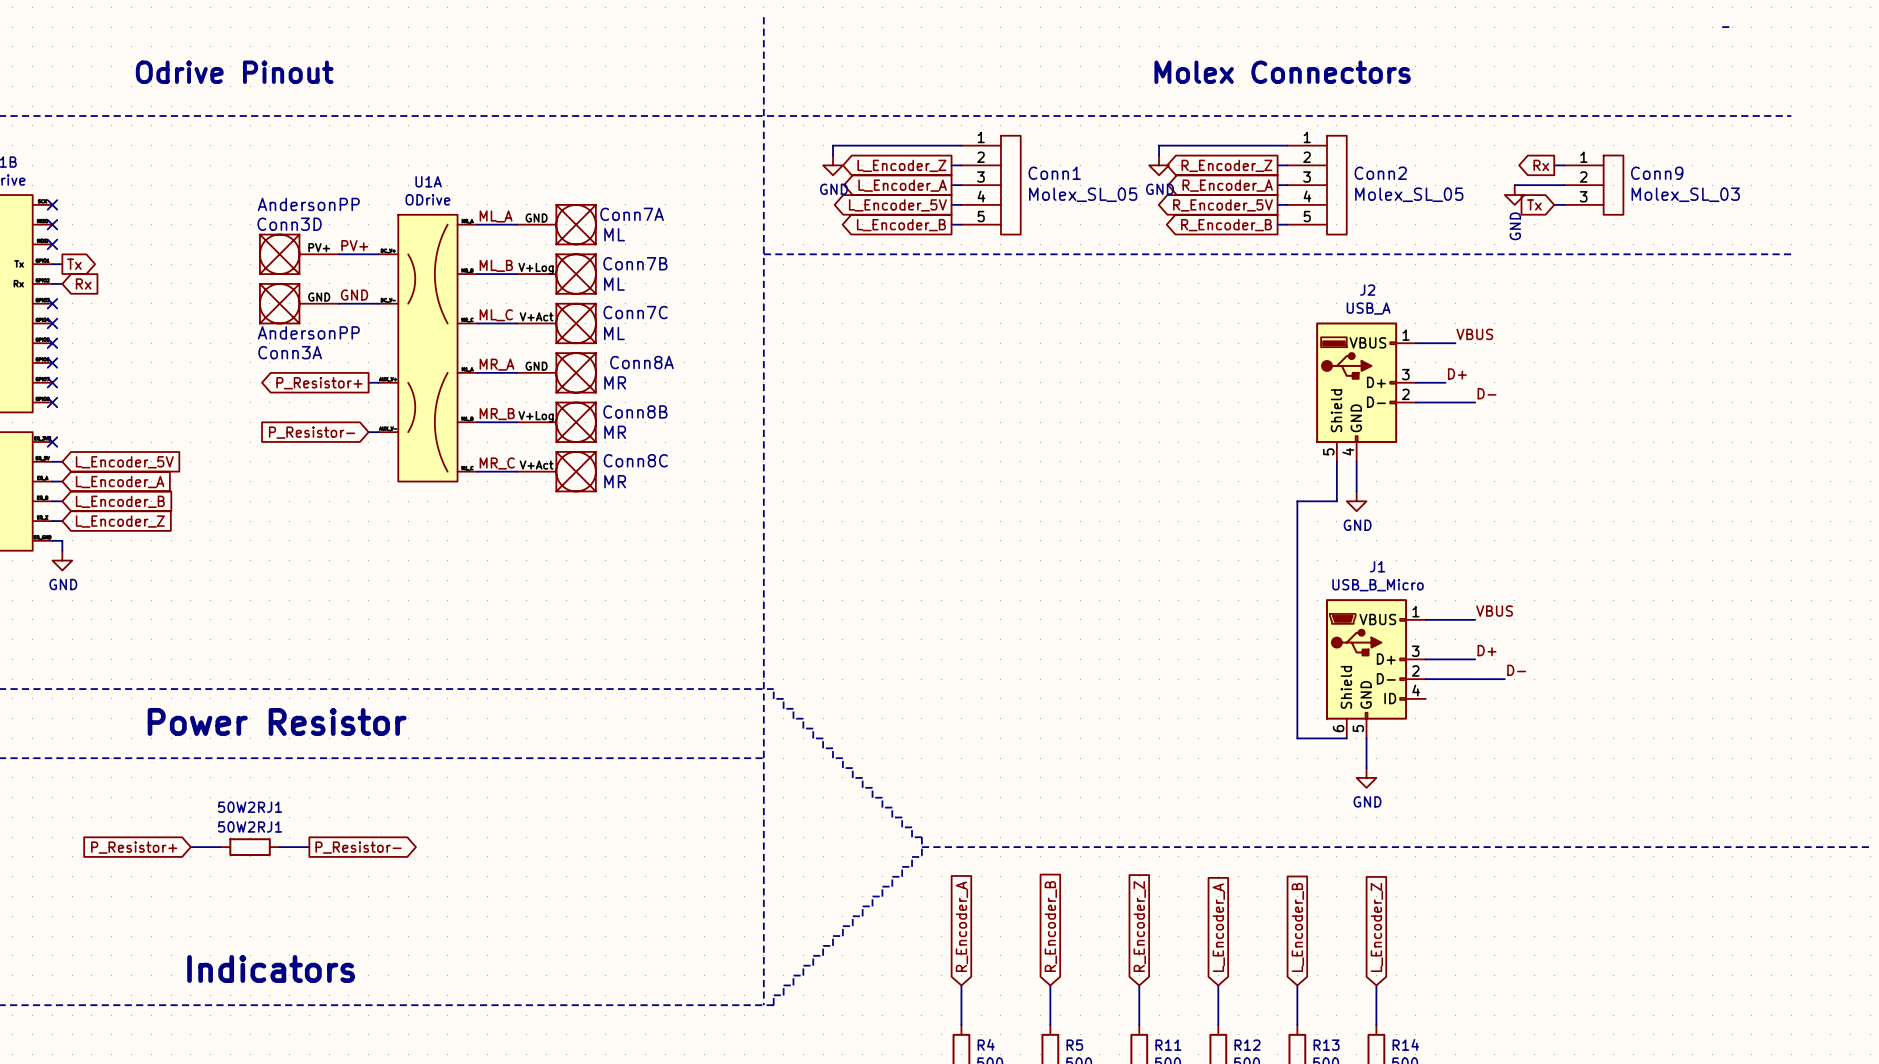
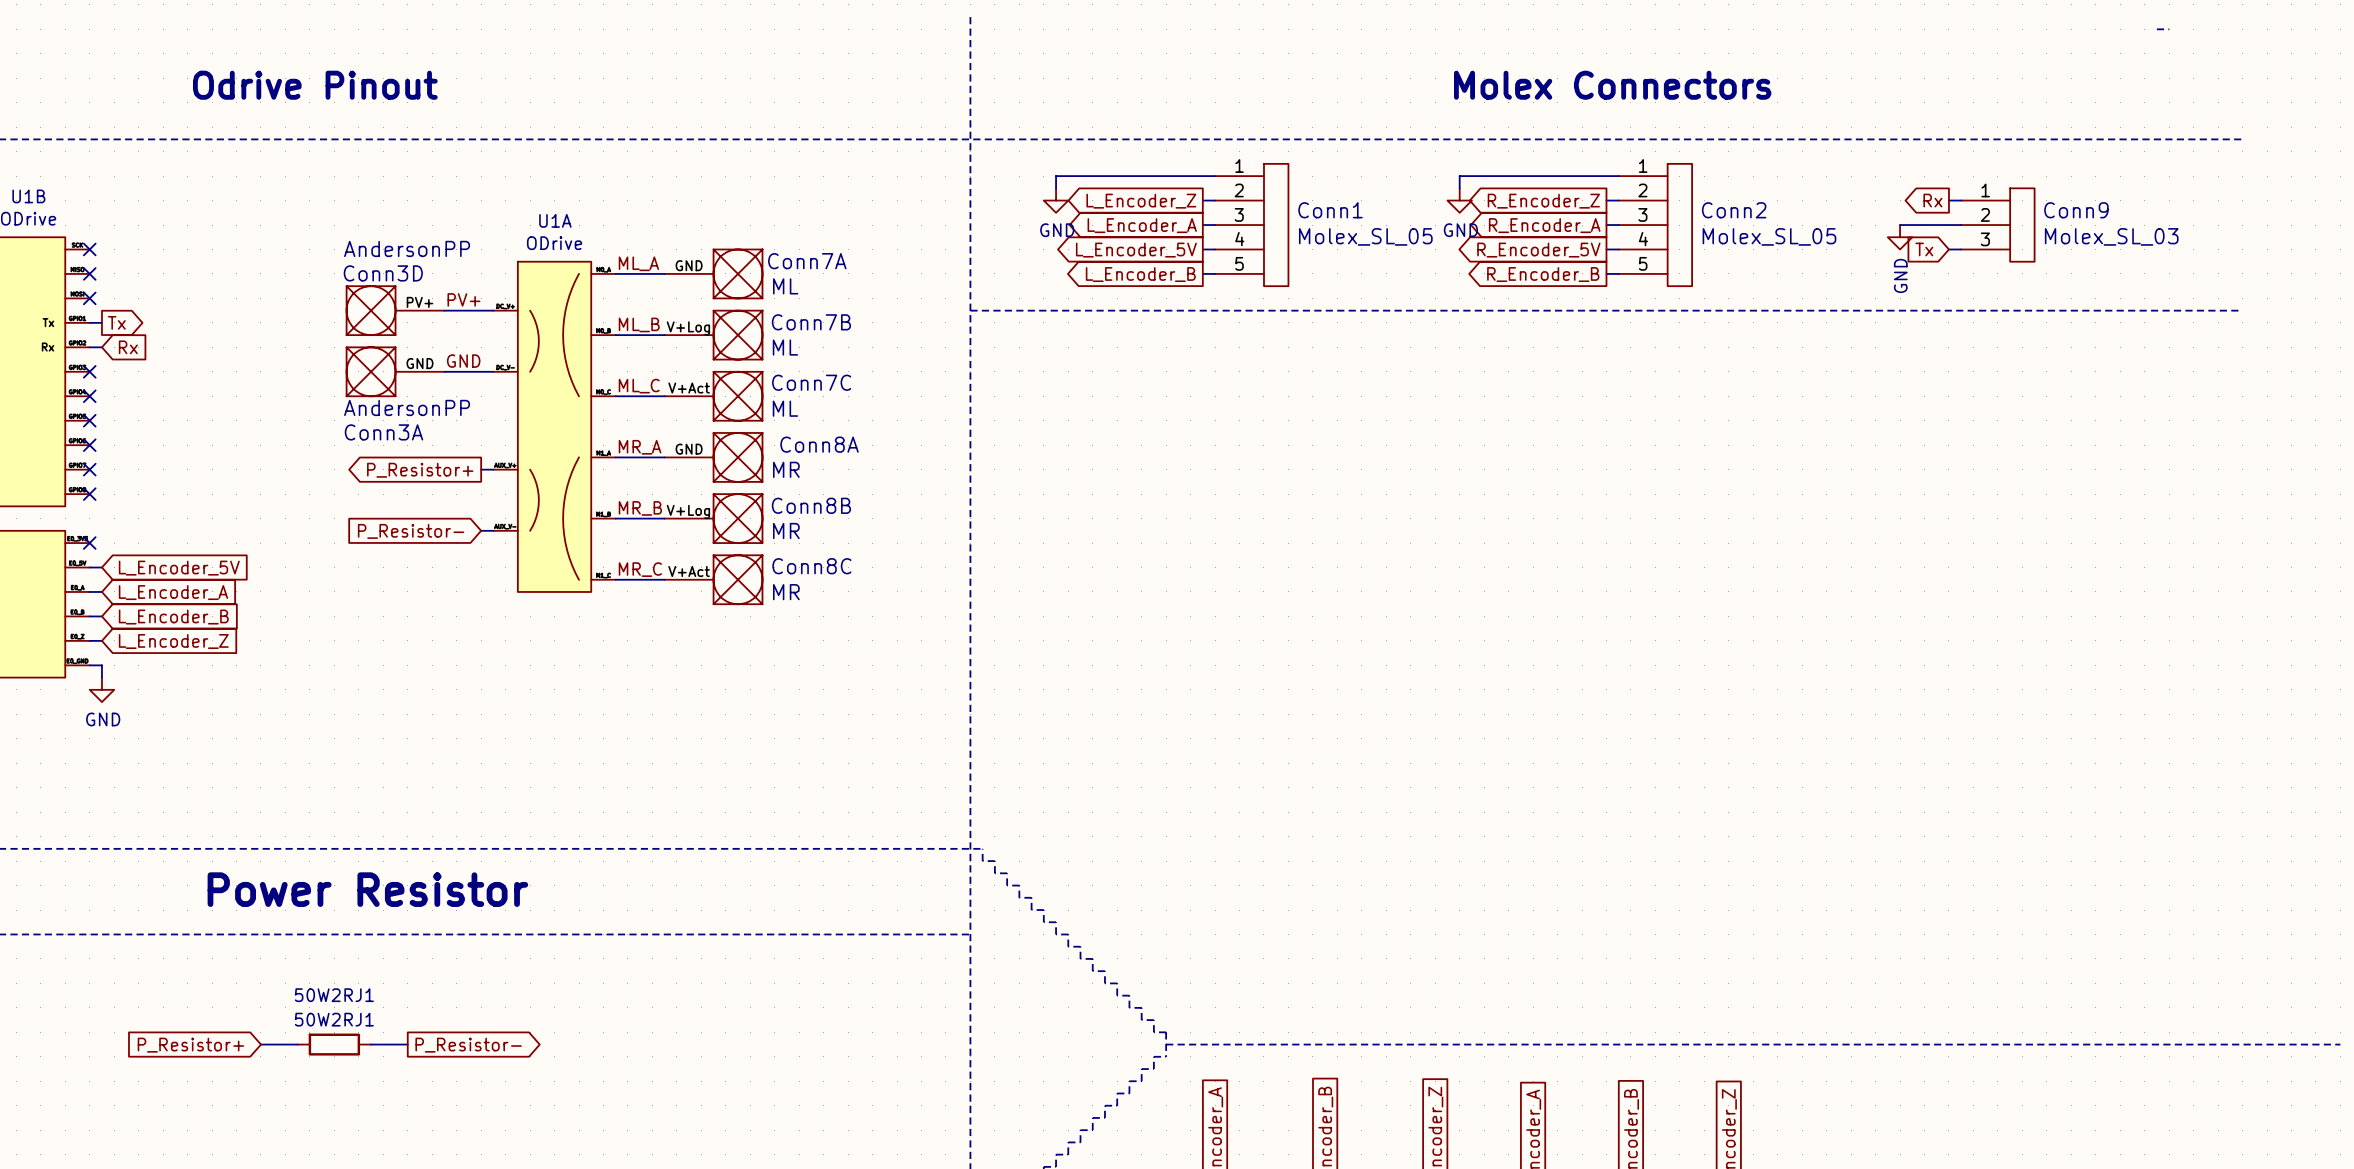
label: VBUS (1474, 334) -> none
wire: (1415, 343) (1455, 343) -> none
label: D+ (1457, 373) -> none
wire: (1415, 382) (1445, 382) -> none
J2: USB_A (1366, 392) -> none
label: D- (1487, 393) -> none
wire: (1415, 402) (1475, 402) -> none
wire: (1336, 461) (1336, 501) (1297, 501) (1297, 738) (1346, 738) -> none
wire: (1356, 461) (1356, 491) -> none
power symbol: GND (1356, 501) -> none
label: VBUS (1494, 611) -> none
wire: (1425, 619) (1475, 619) -> none
label: D+ (1487, 650) -> none
wire: (1425, 659) (1475, 659) -> none
J1: USB_B_Micro (1375, 668) -> none
label: D- (1516, 670) -> none
wire: (1425, 679) (1504, 679) -> none
wire: (1366, 738) (1366, 768) -> none
power symbol: GND (1366, 777) -> none

